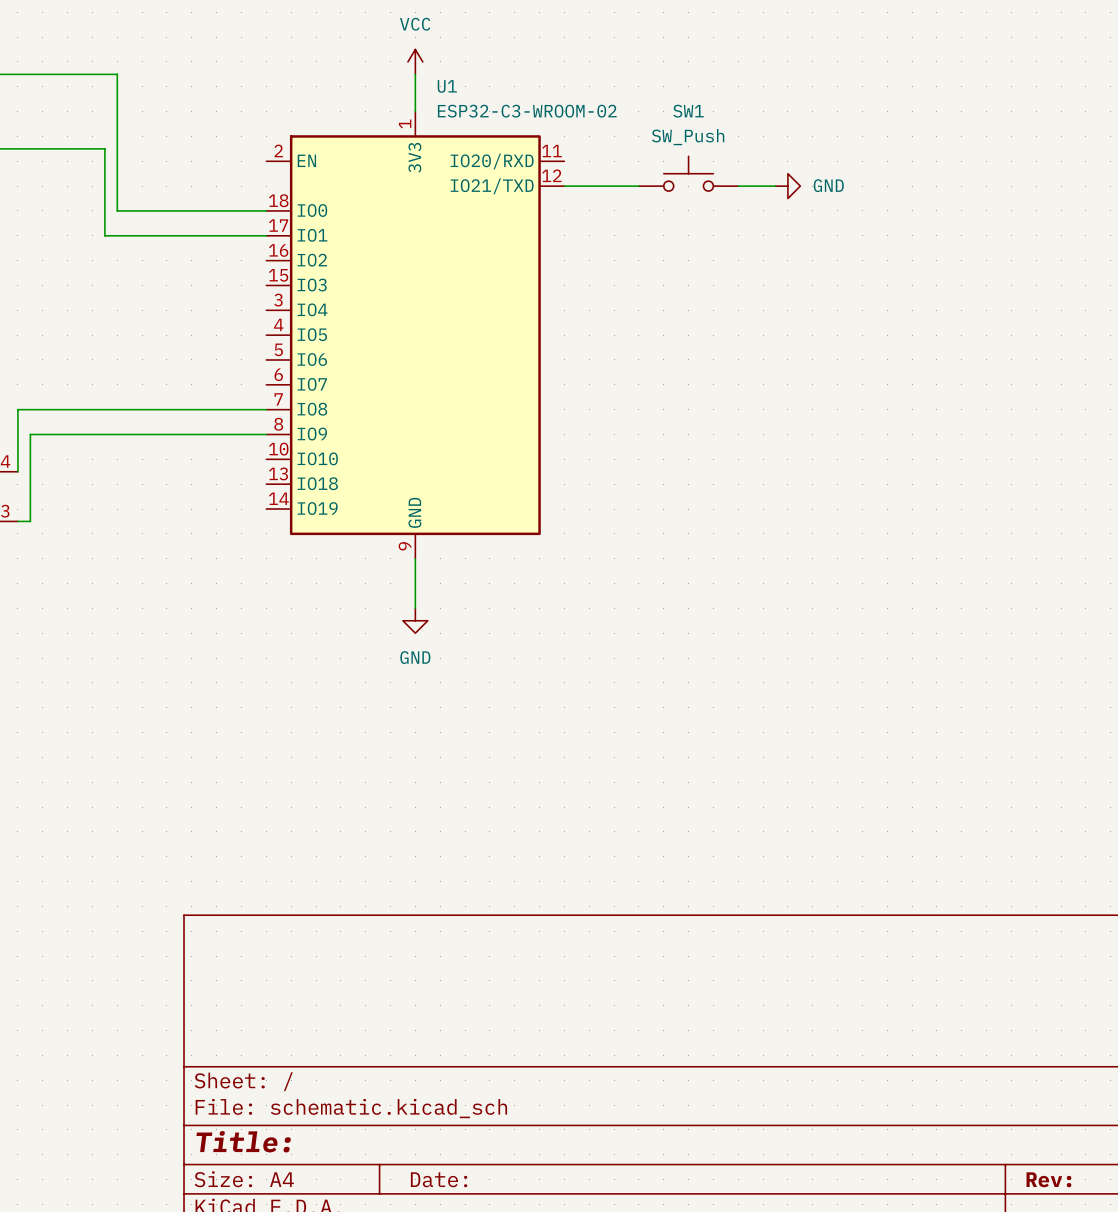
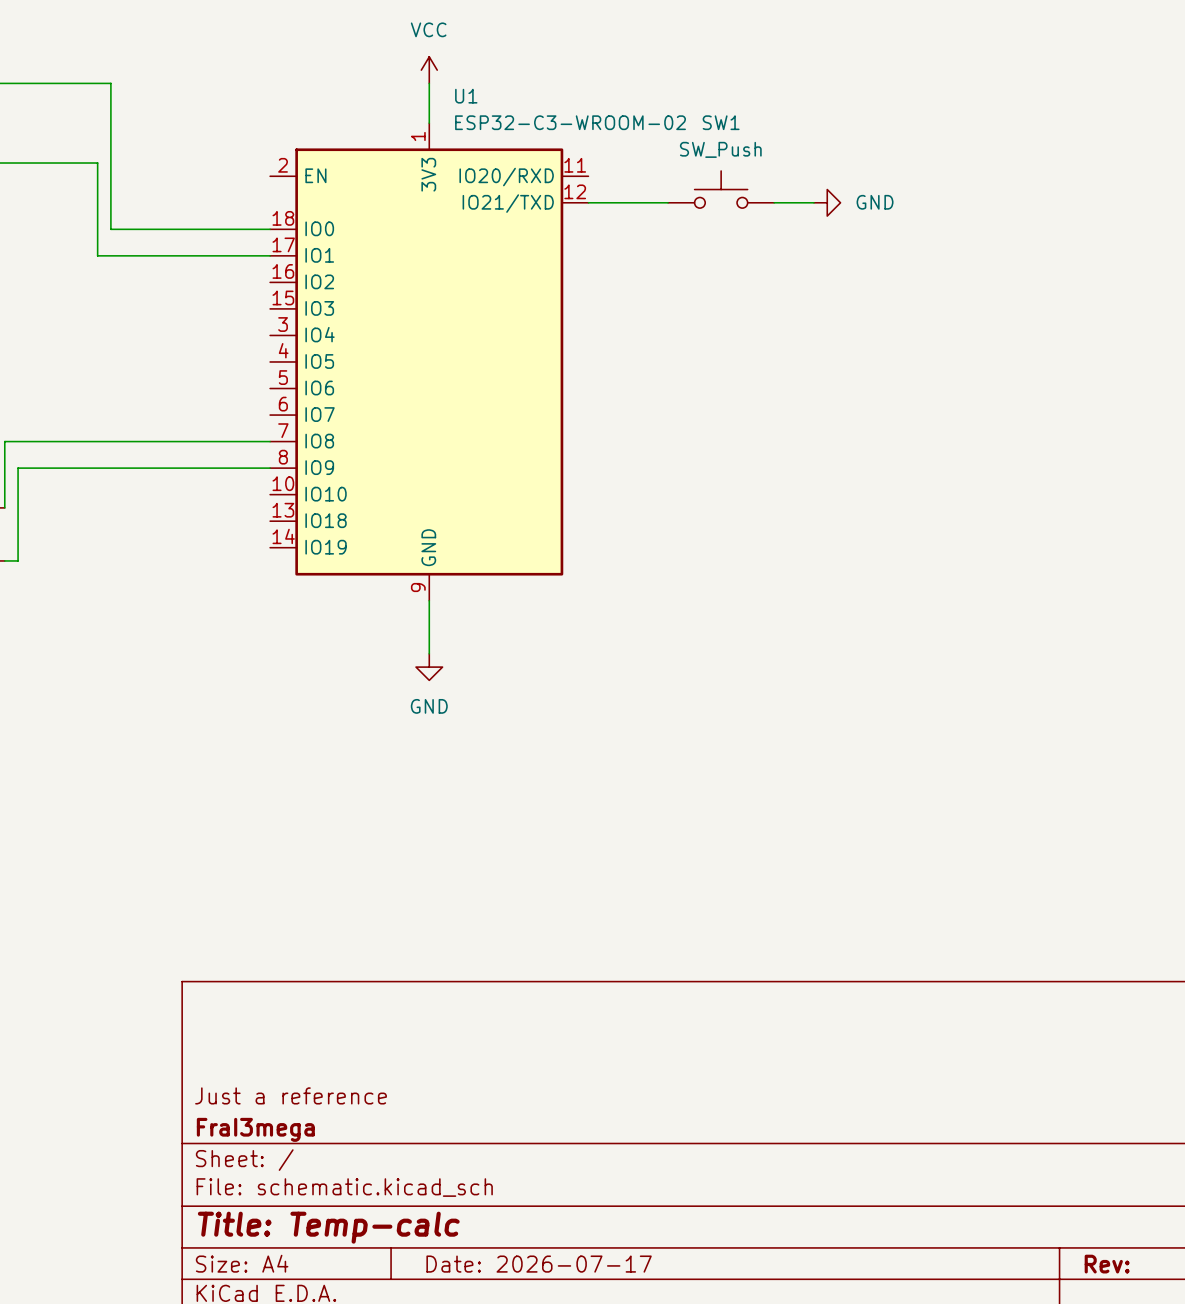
title block: none -> Just a reference (291, 1095)
title block: none -> FraI3mega (255, 1129)
title block: Title: (243, 1141) -> Title: Temp-calc (328, 1227)
title block: Date: (439, 1179) -> Date: 2026-07-17 (539, 1264)

